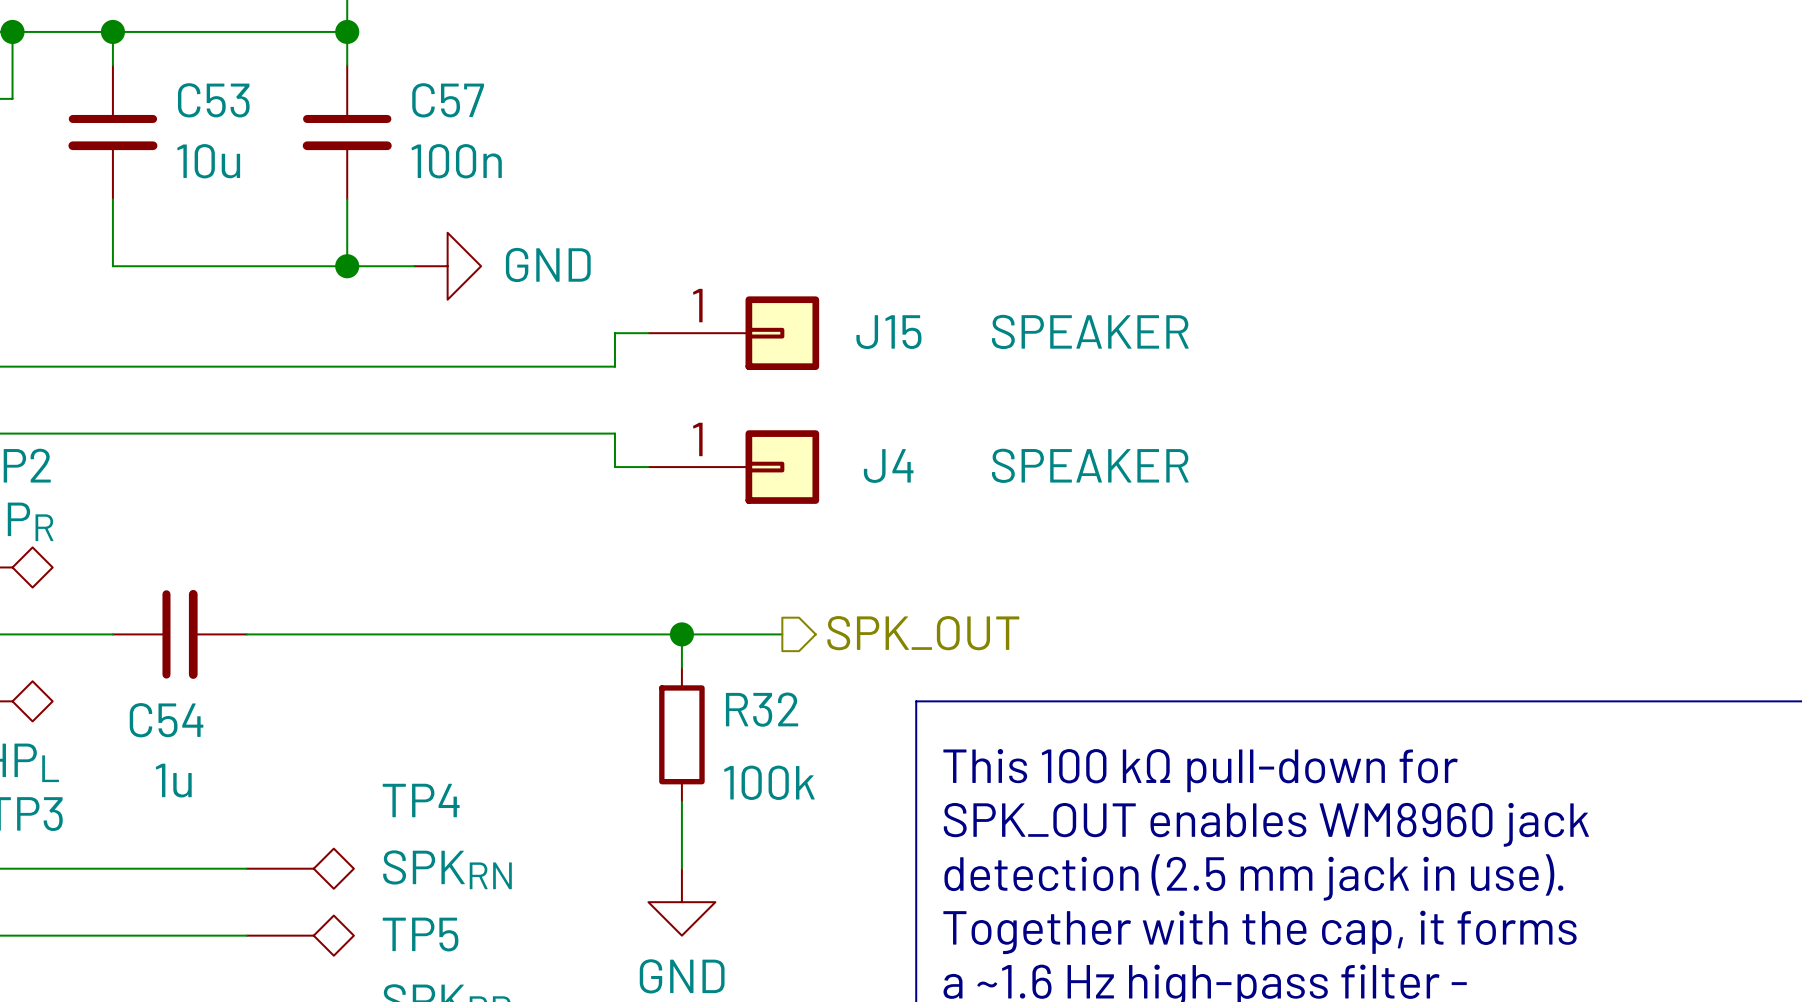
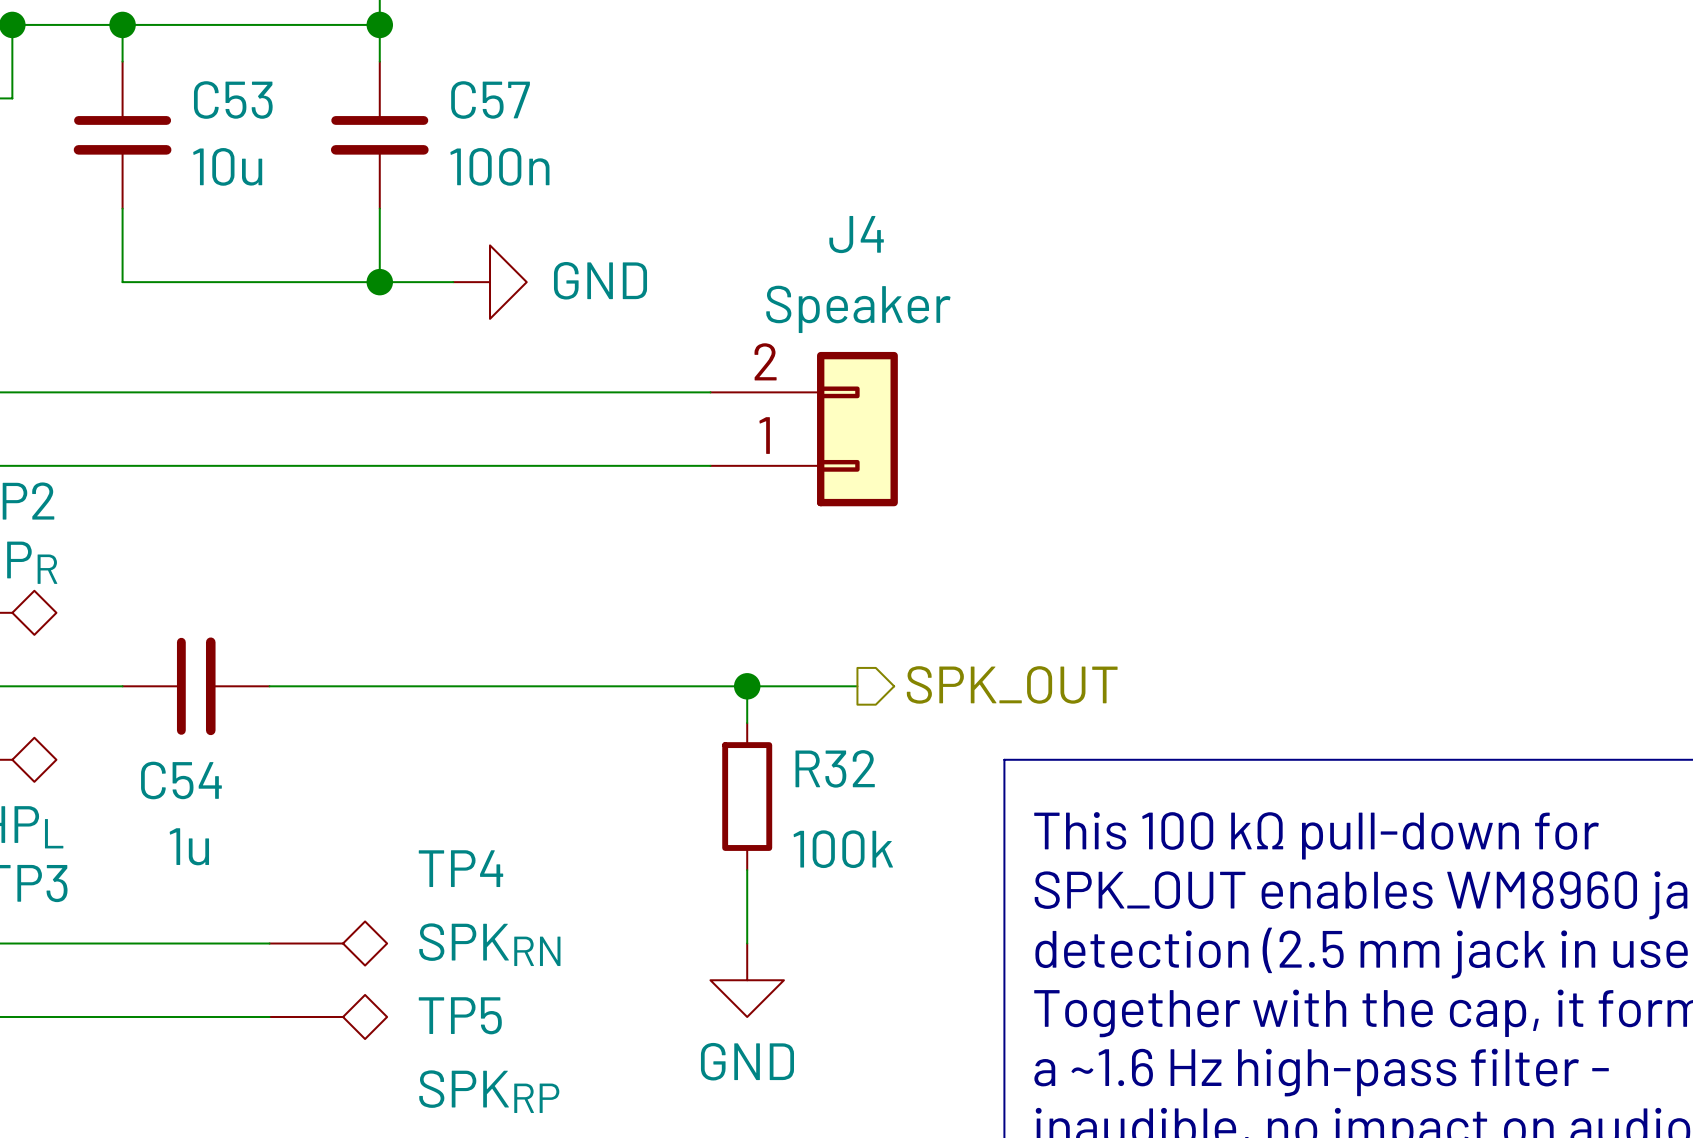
wire: (648, 333) (614, 333) (614, 366) -> (710, 392) (673, 392)
J15: SPEAKER (733, 333) -> none
J4 symbol: [648, 430, 820, 504] -> [710, 351, 898, 507]
wire: (614, 433) (614, 467) (648, 467) -> (673, 465) (710, 465)
J4 value: SPEAKER (1090, 465) -> Speaker (858, 309)
J4 name position: J4 (888, 466) -> J4 (856, 234)

